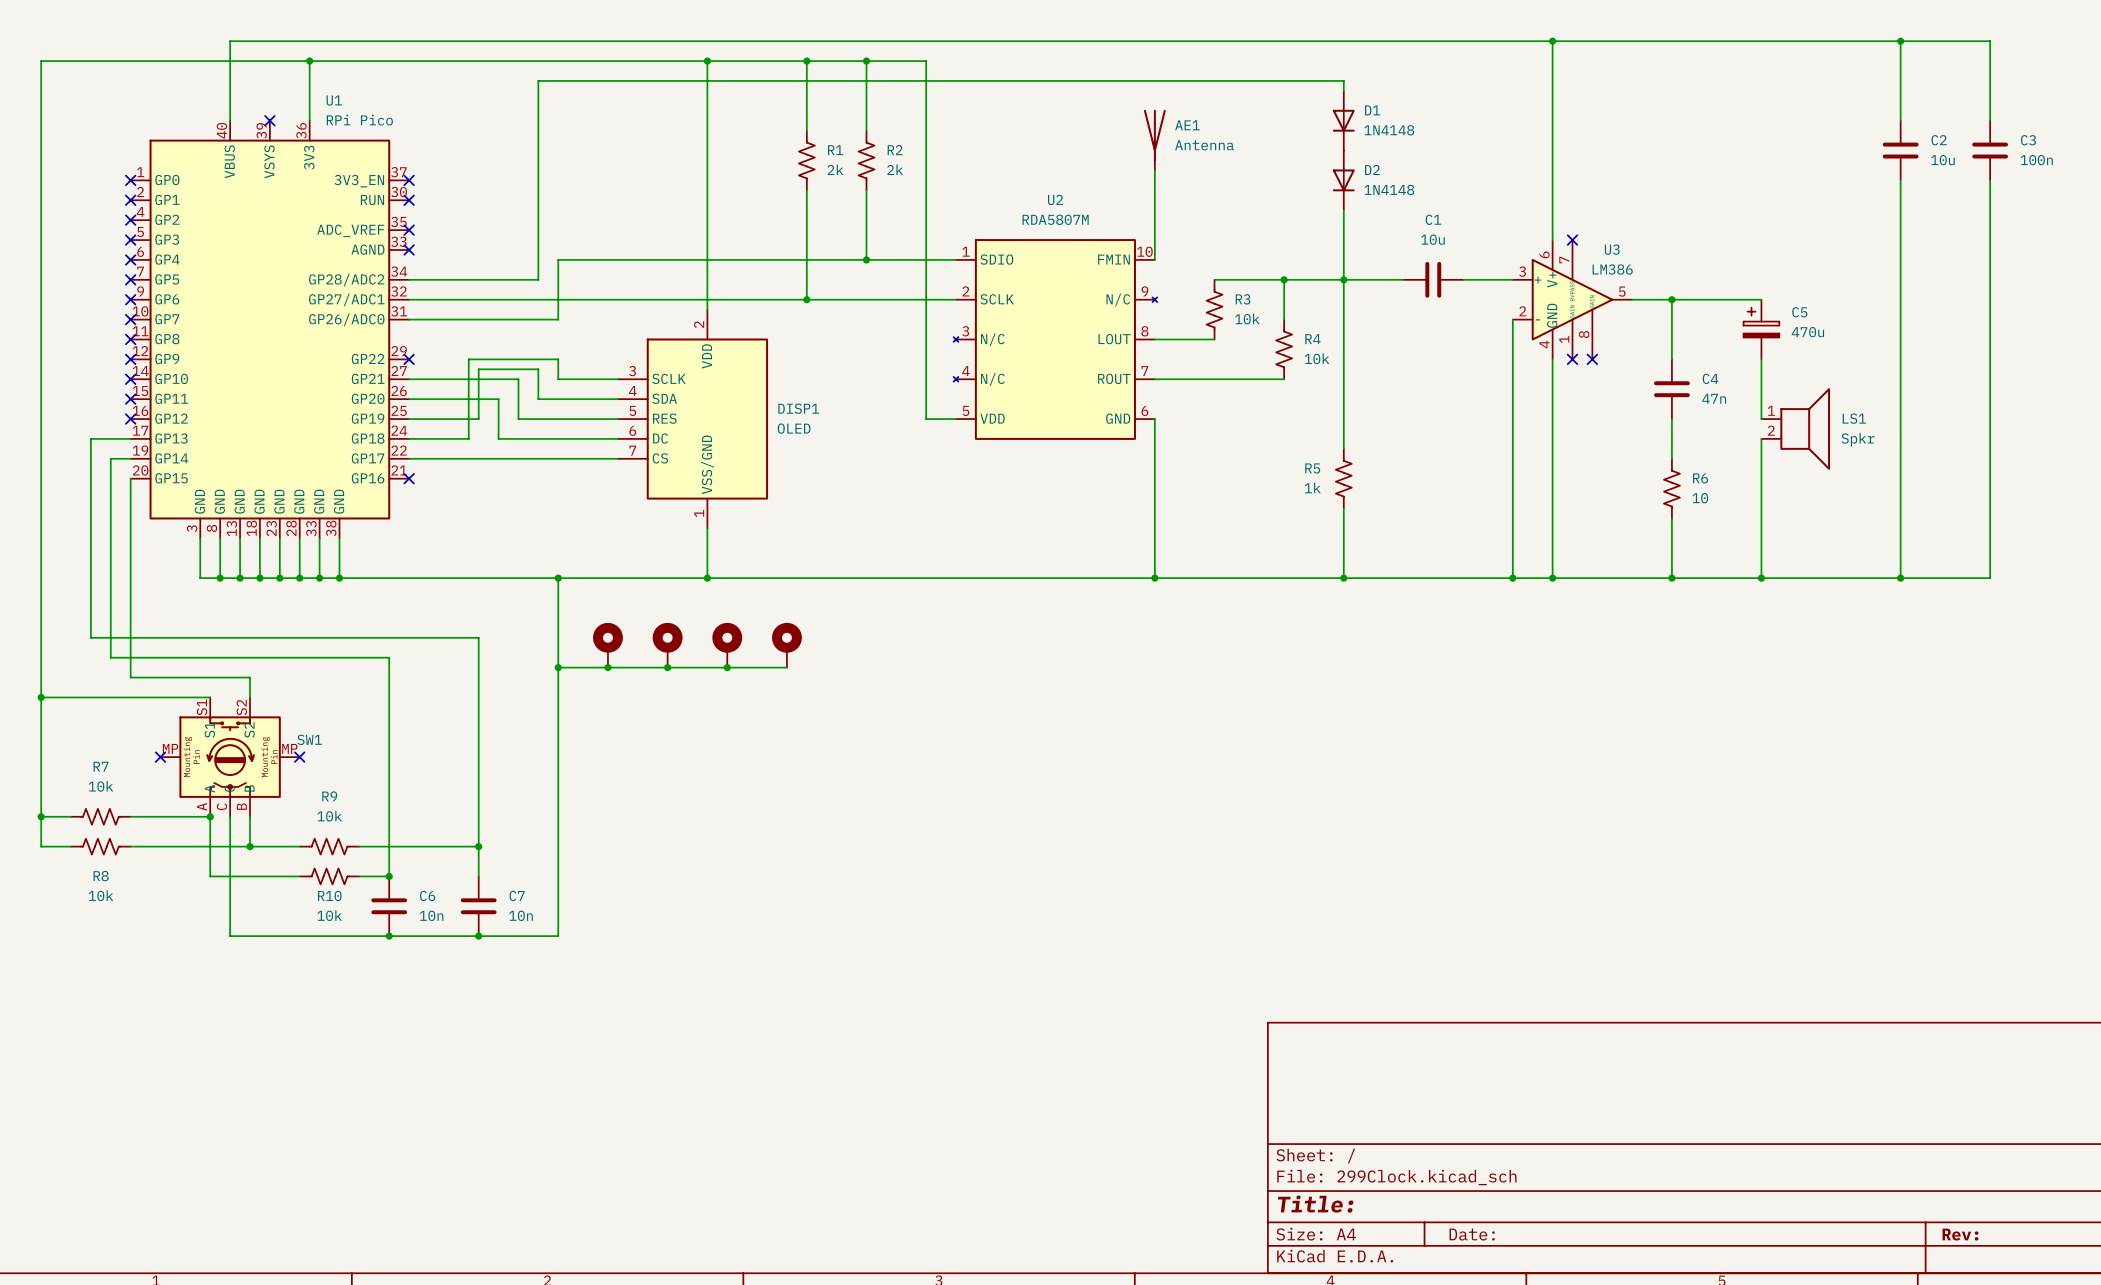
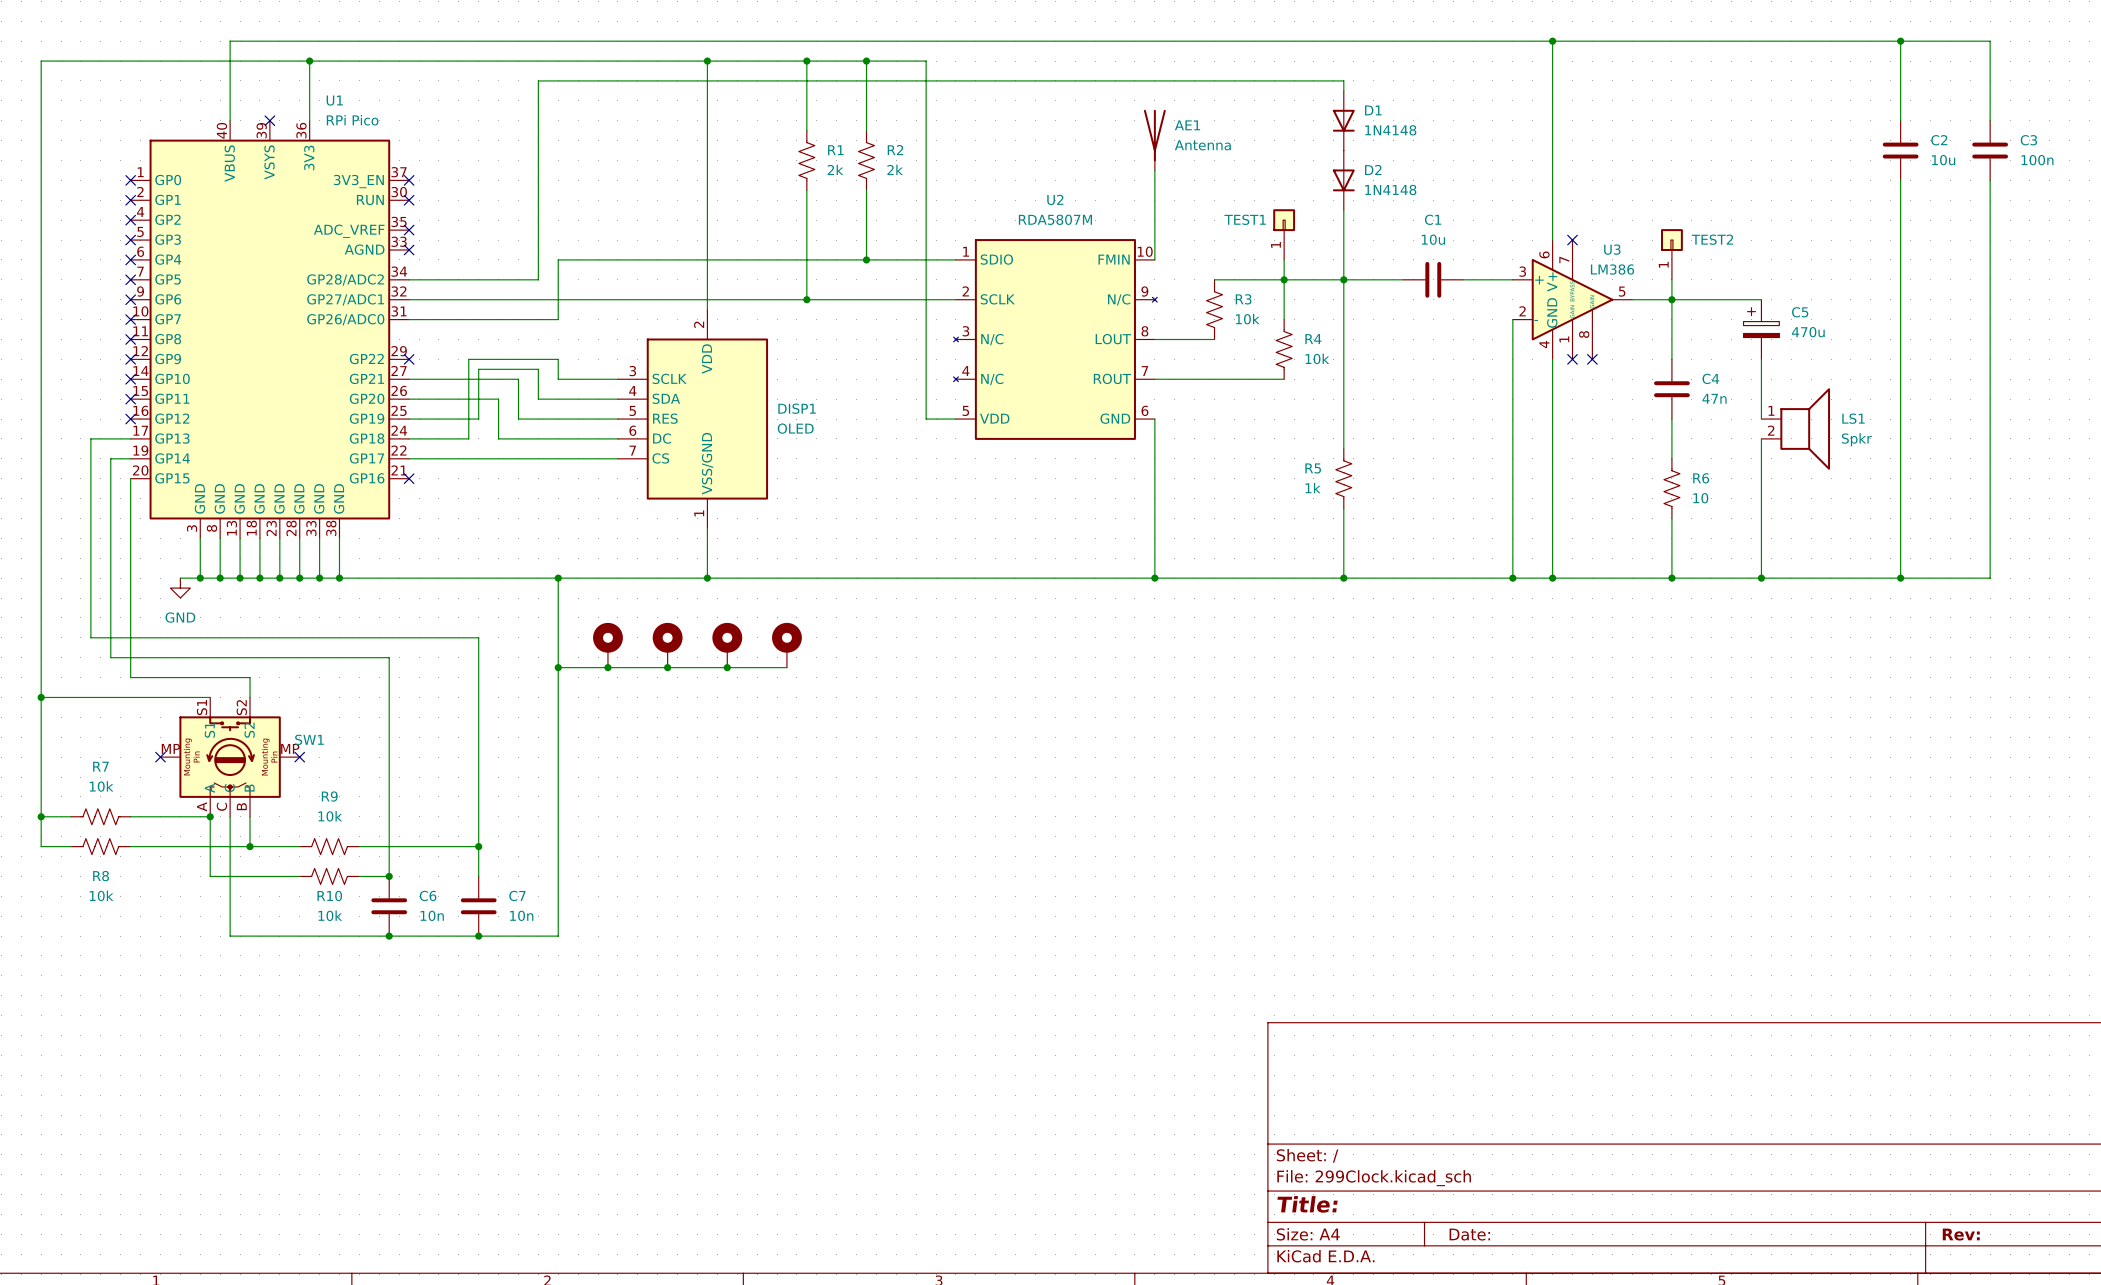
TEST1: none -> (1284, 234)
TEST2: none -> (1671, 254)
wire: none -> (1284, 259) (1284, 279)
wire: none -> (1671, 279) (1671, 299)
wire: none -> (180, 578) (200, 578)
junction: none -> (200, 578)
power symbol: none -> GND (180, 588)

